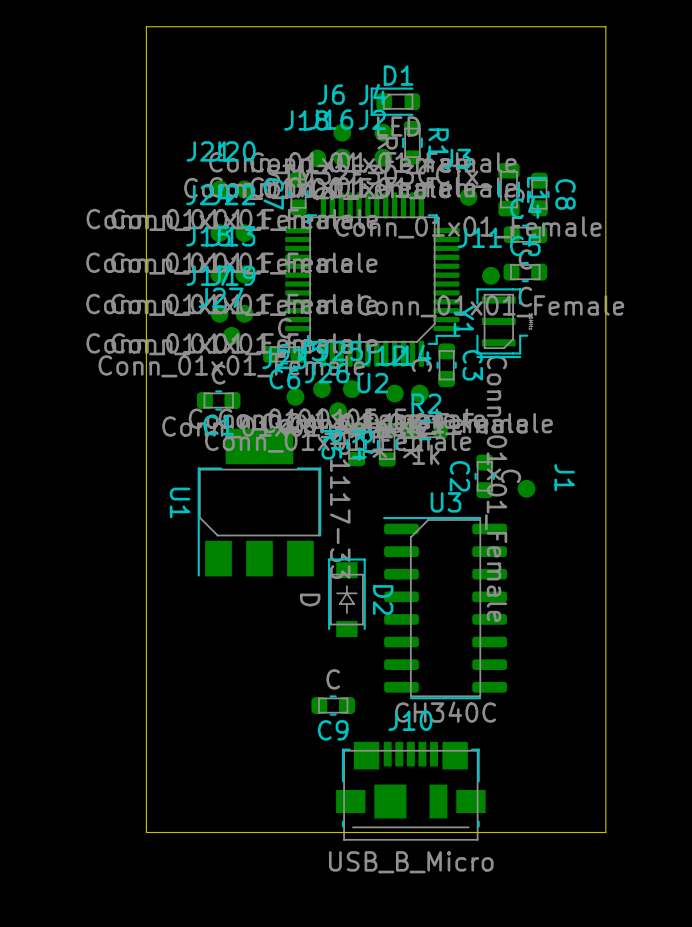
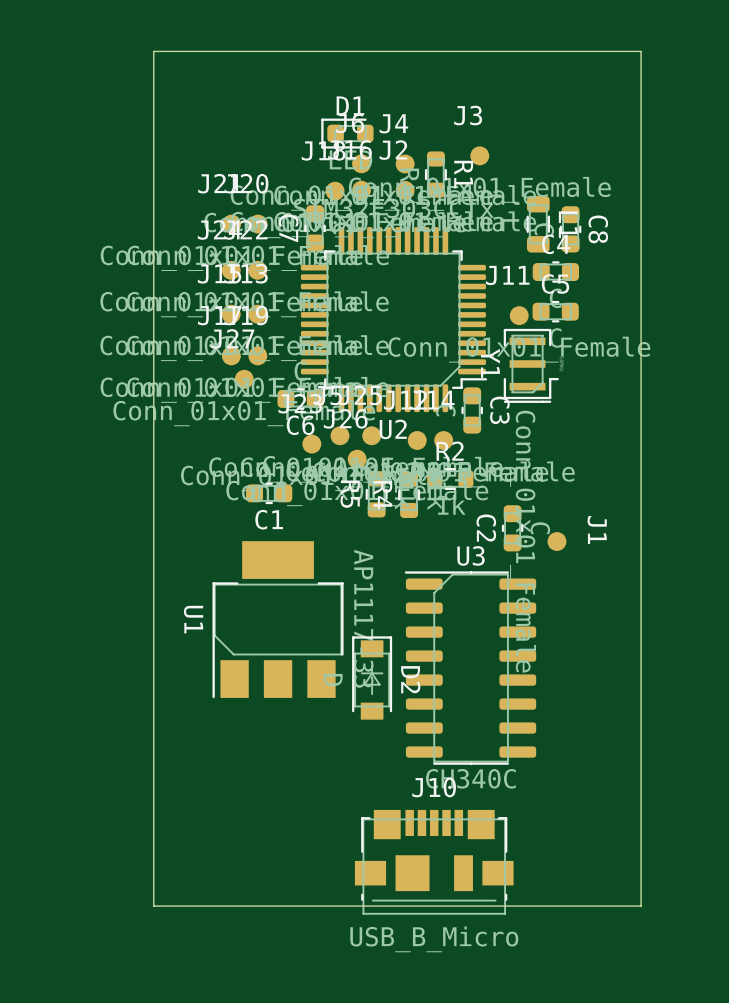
D1 position: (395, 101) -> (347, 133)
J3 position: (468, 196) -> (479, 155)
C1 position: (218, 400) -> (269, 493)
U1 position: (259, 502) -> (278, 619)
D2 position: (346, 597) -> (372, 677)
C9: C (333, 705) -> none

